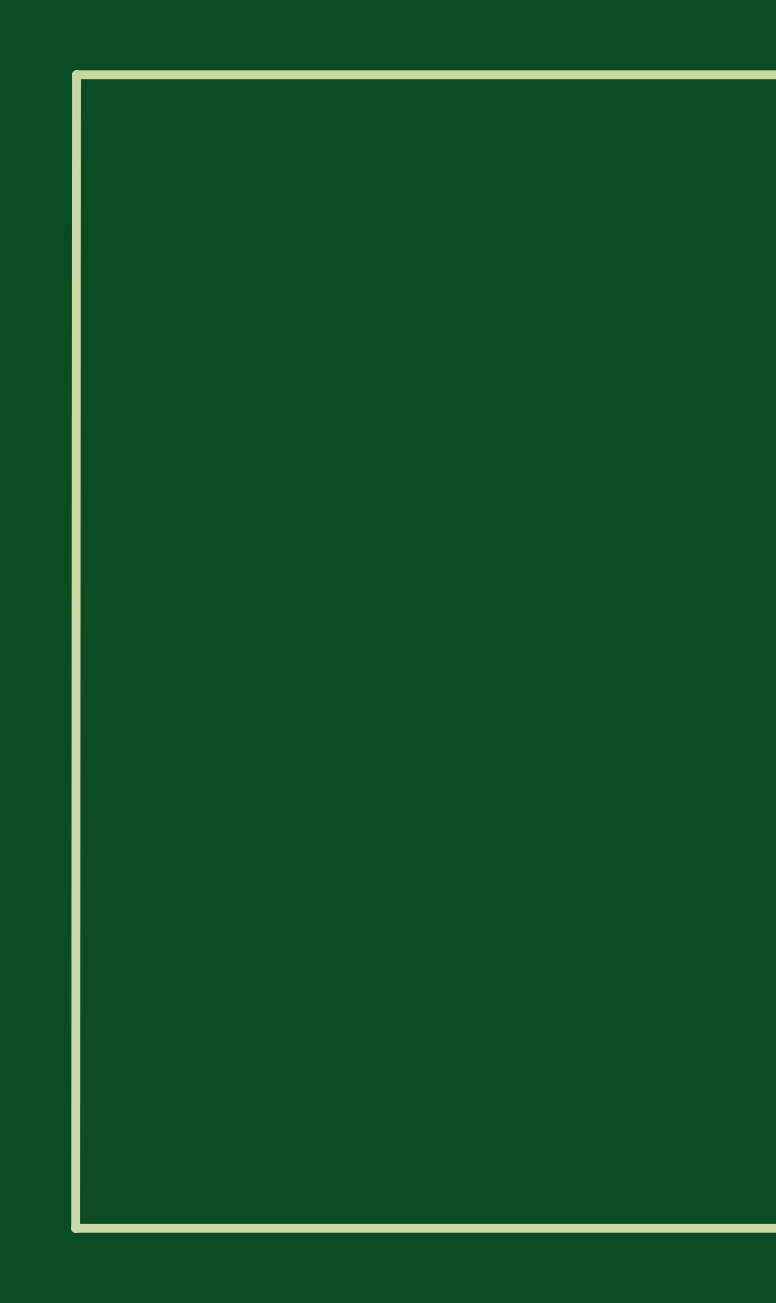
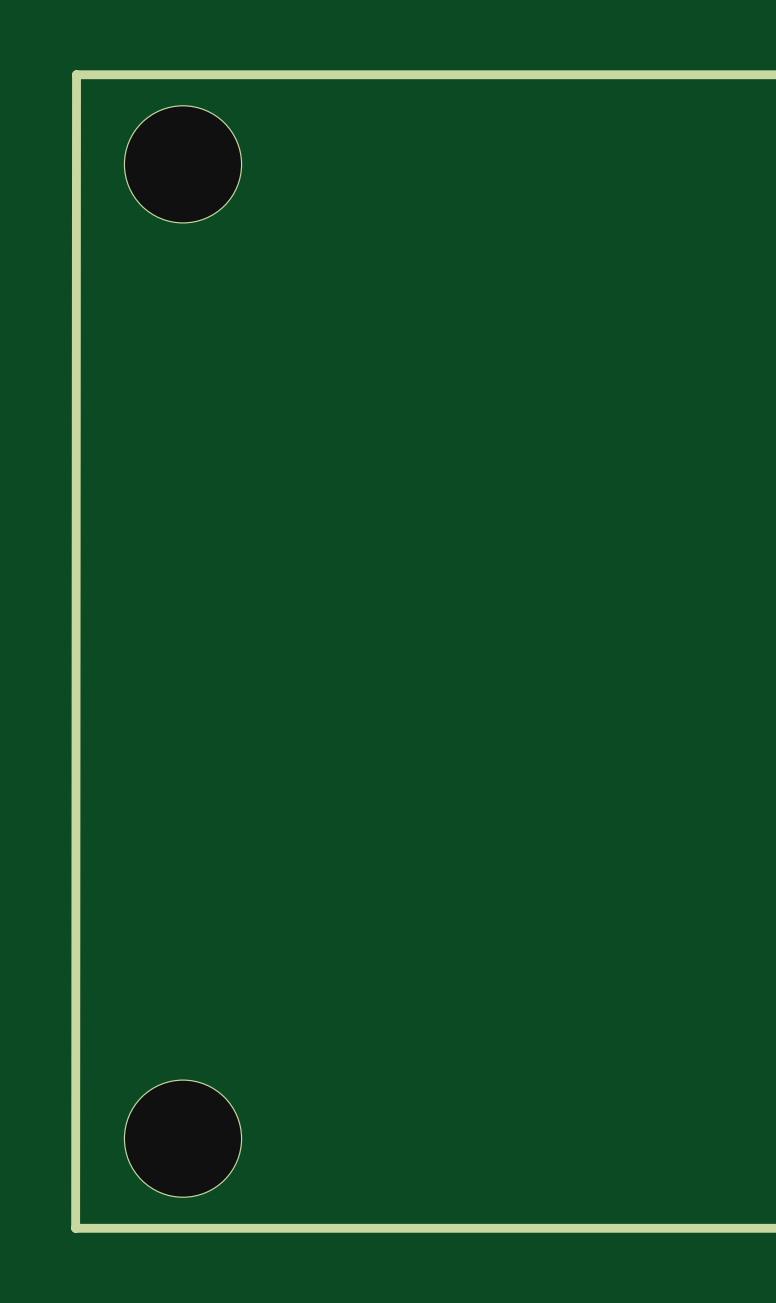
hole: none -> (183, 164)
hole: none -> (183, 1138)

